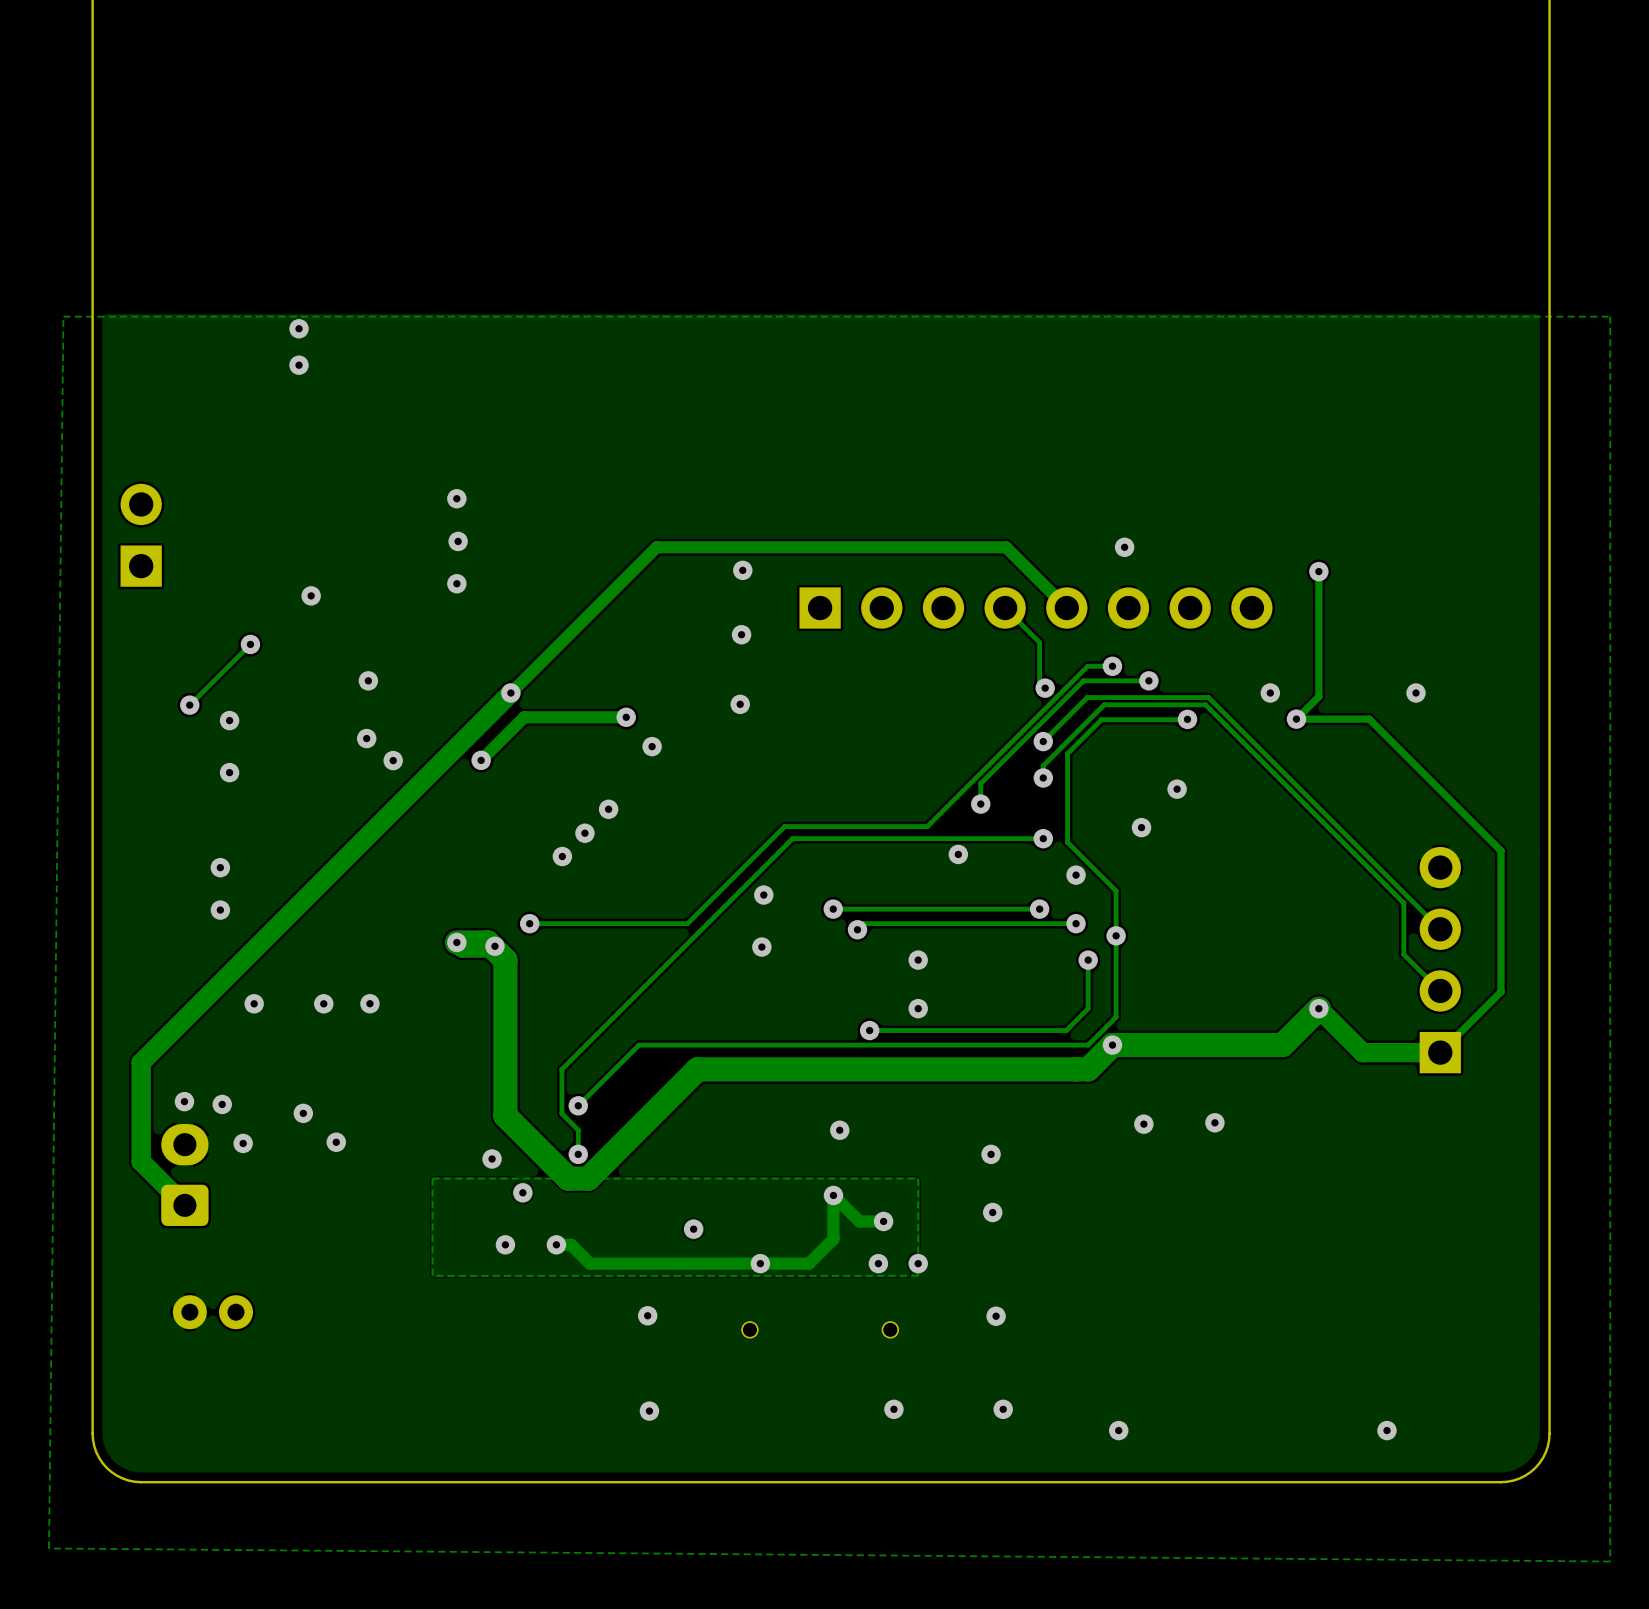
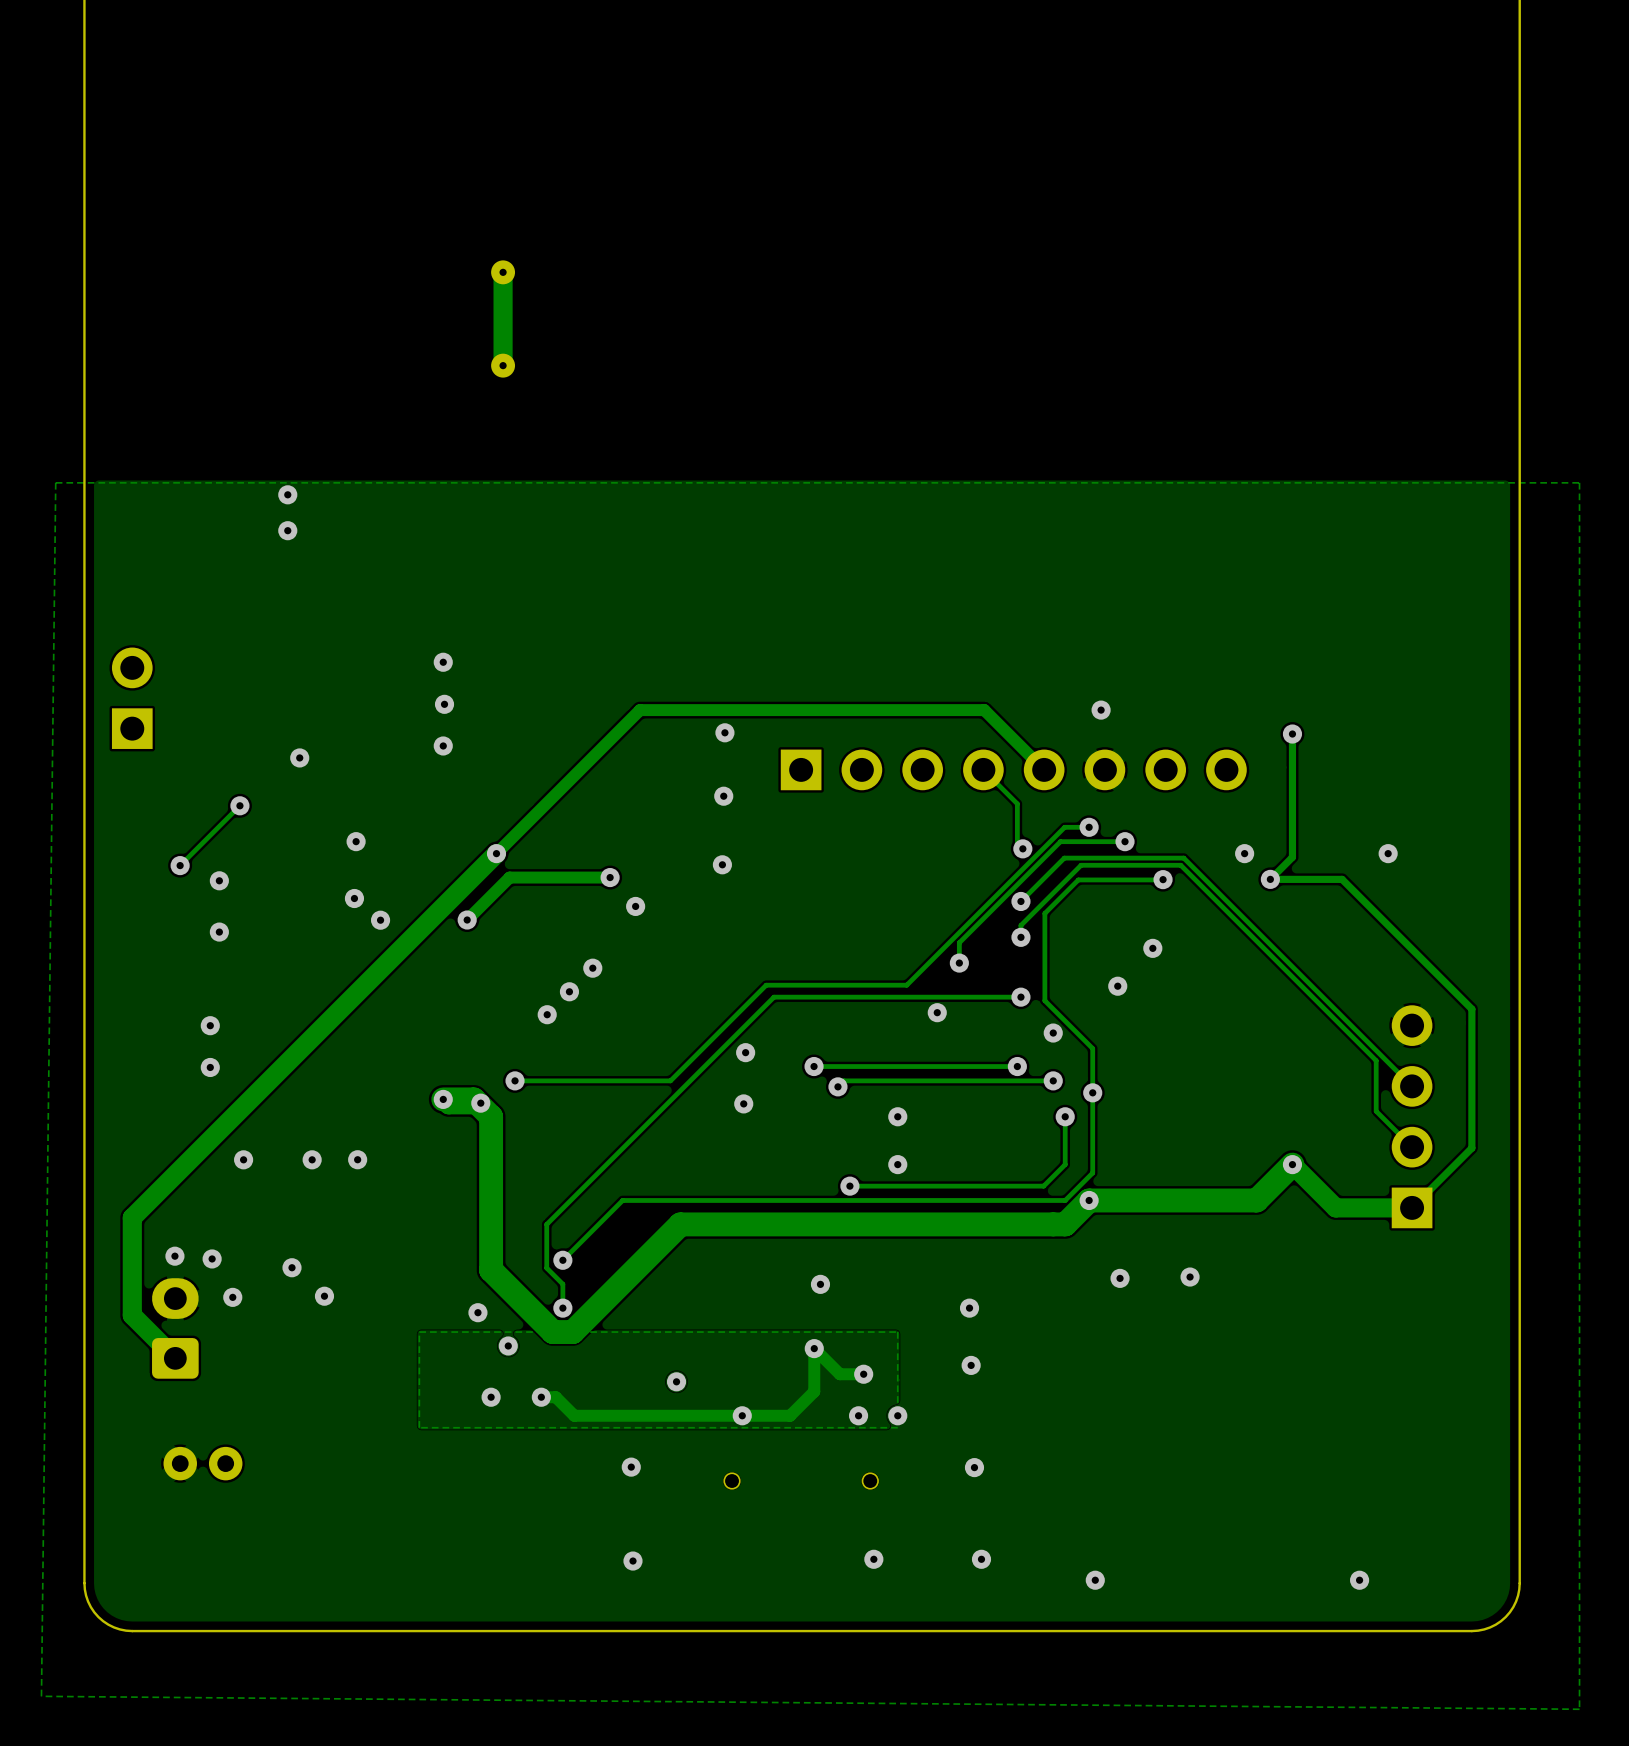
part: none -> (503, 318)

